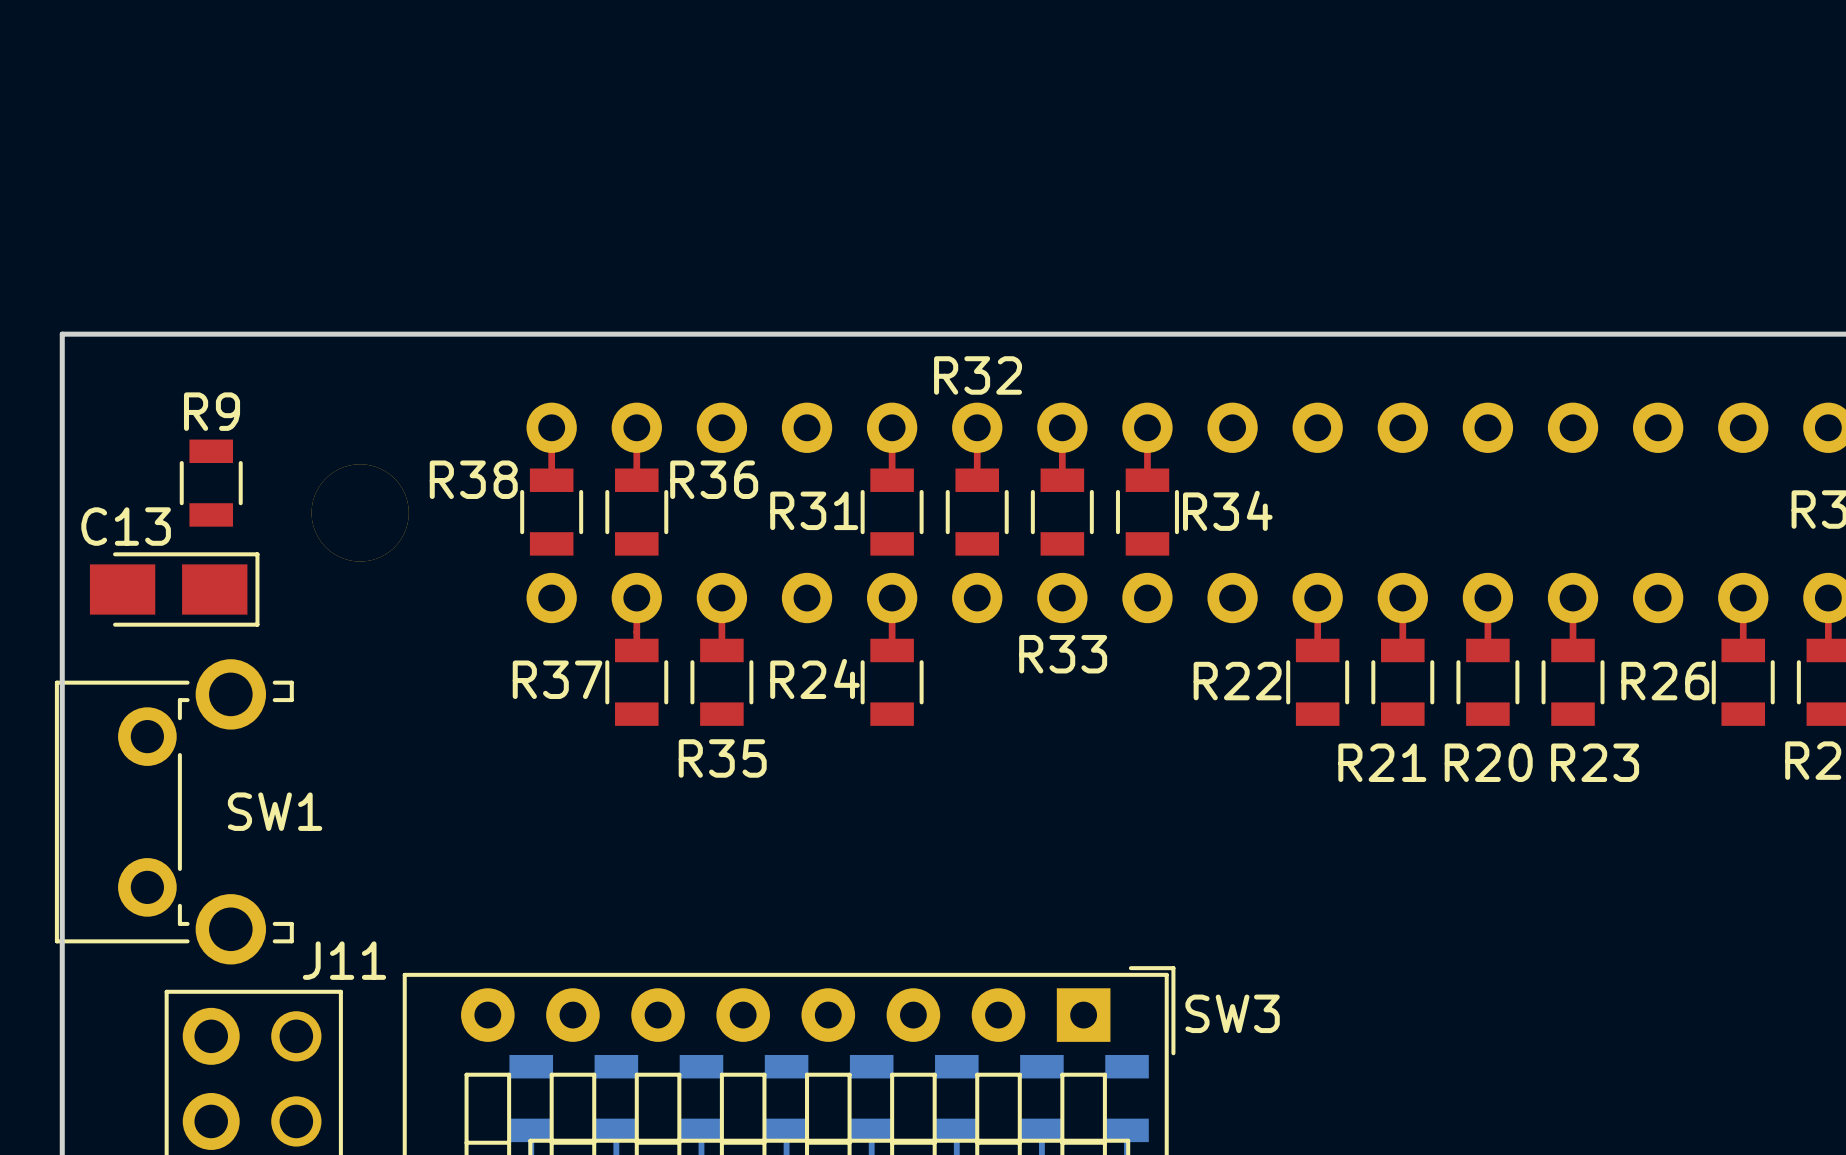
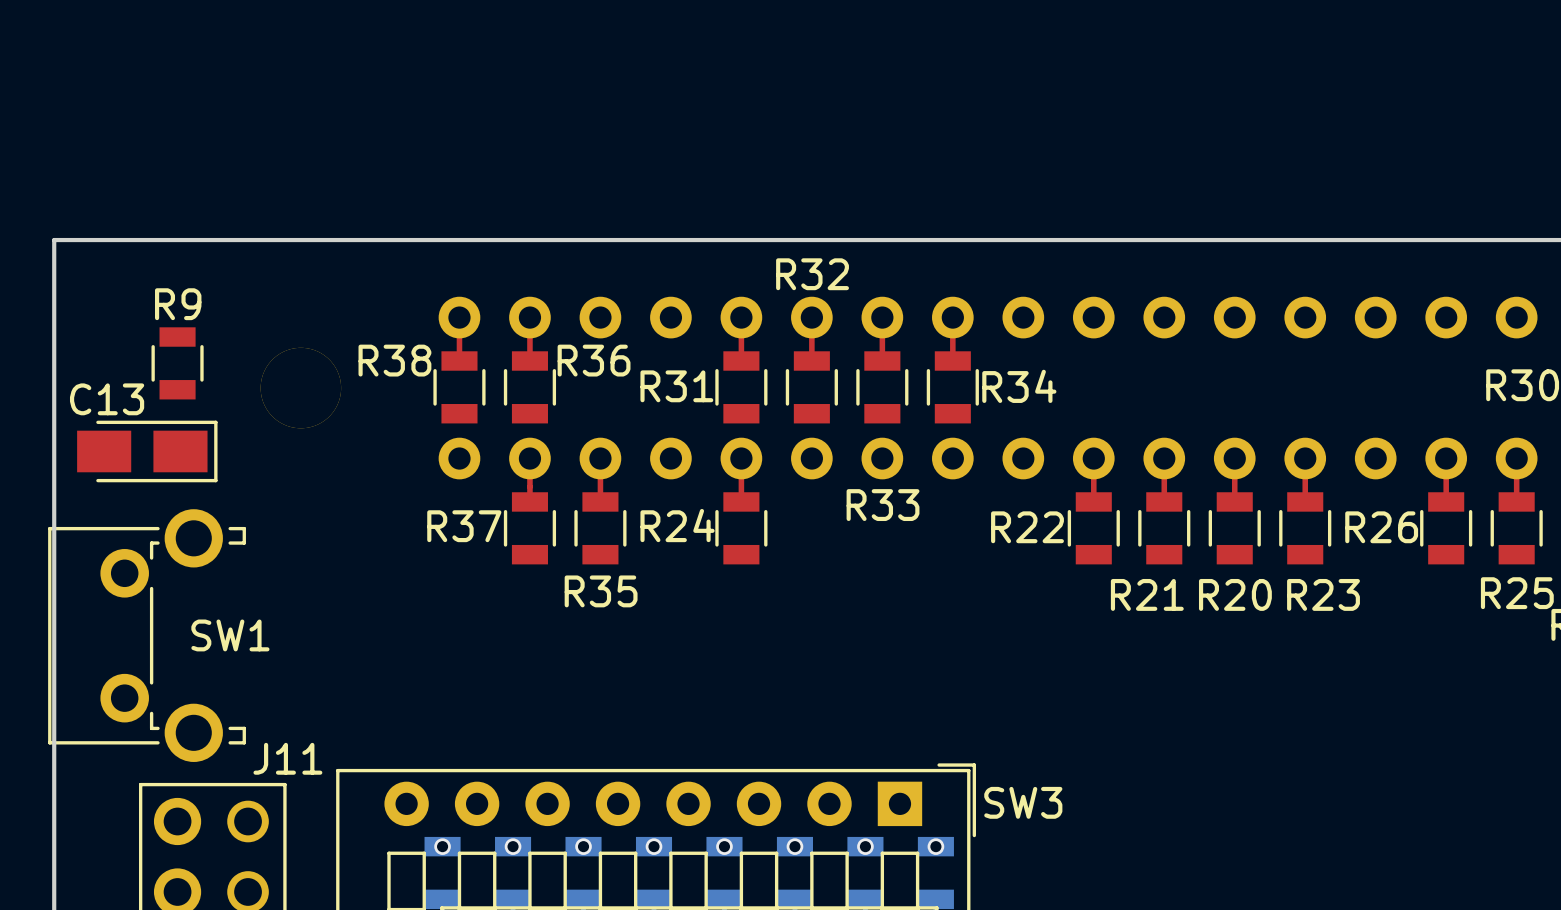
via: none -> (442, 846)
via: none -> (513, 846)
via: none -> (583, 846)
via: none -> (654, 846)
via: none -> (724, 846)
via: none -> (794, 846)
via: none -> (865, 846)
via: none -> (935, 846)

